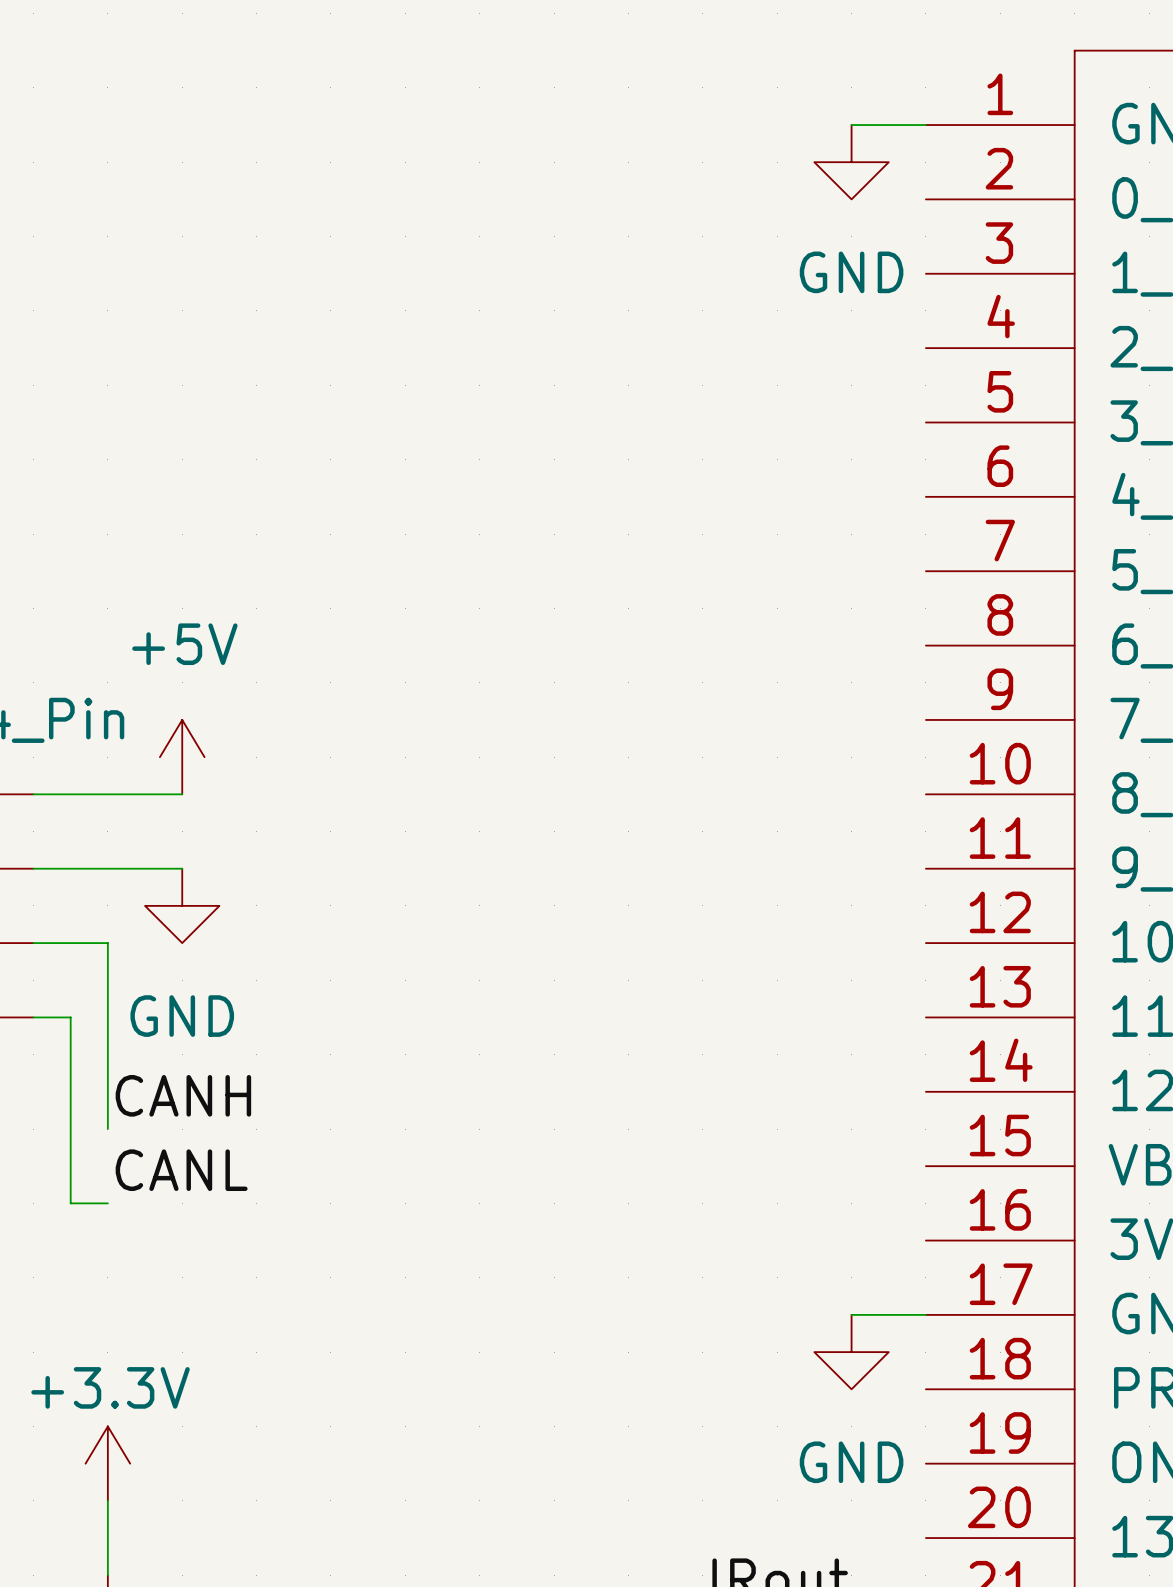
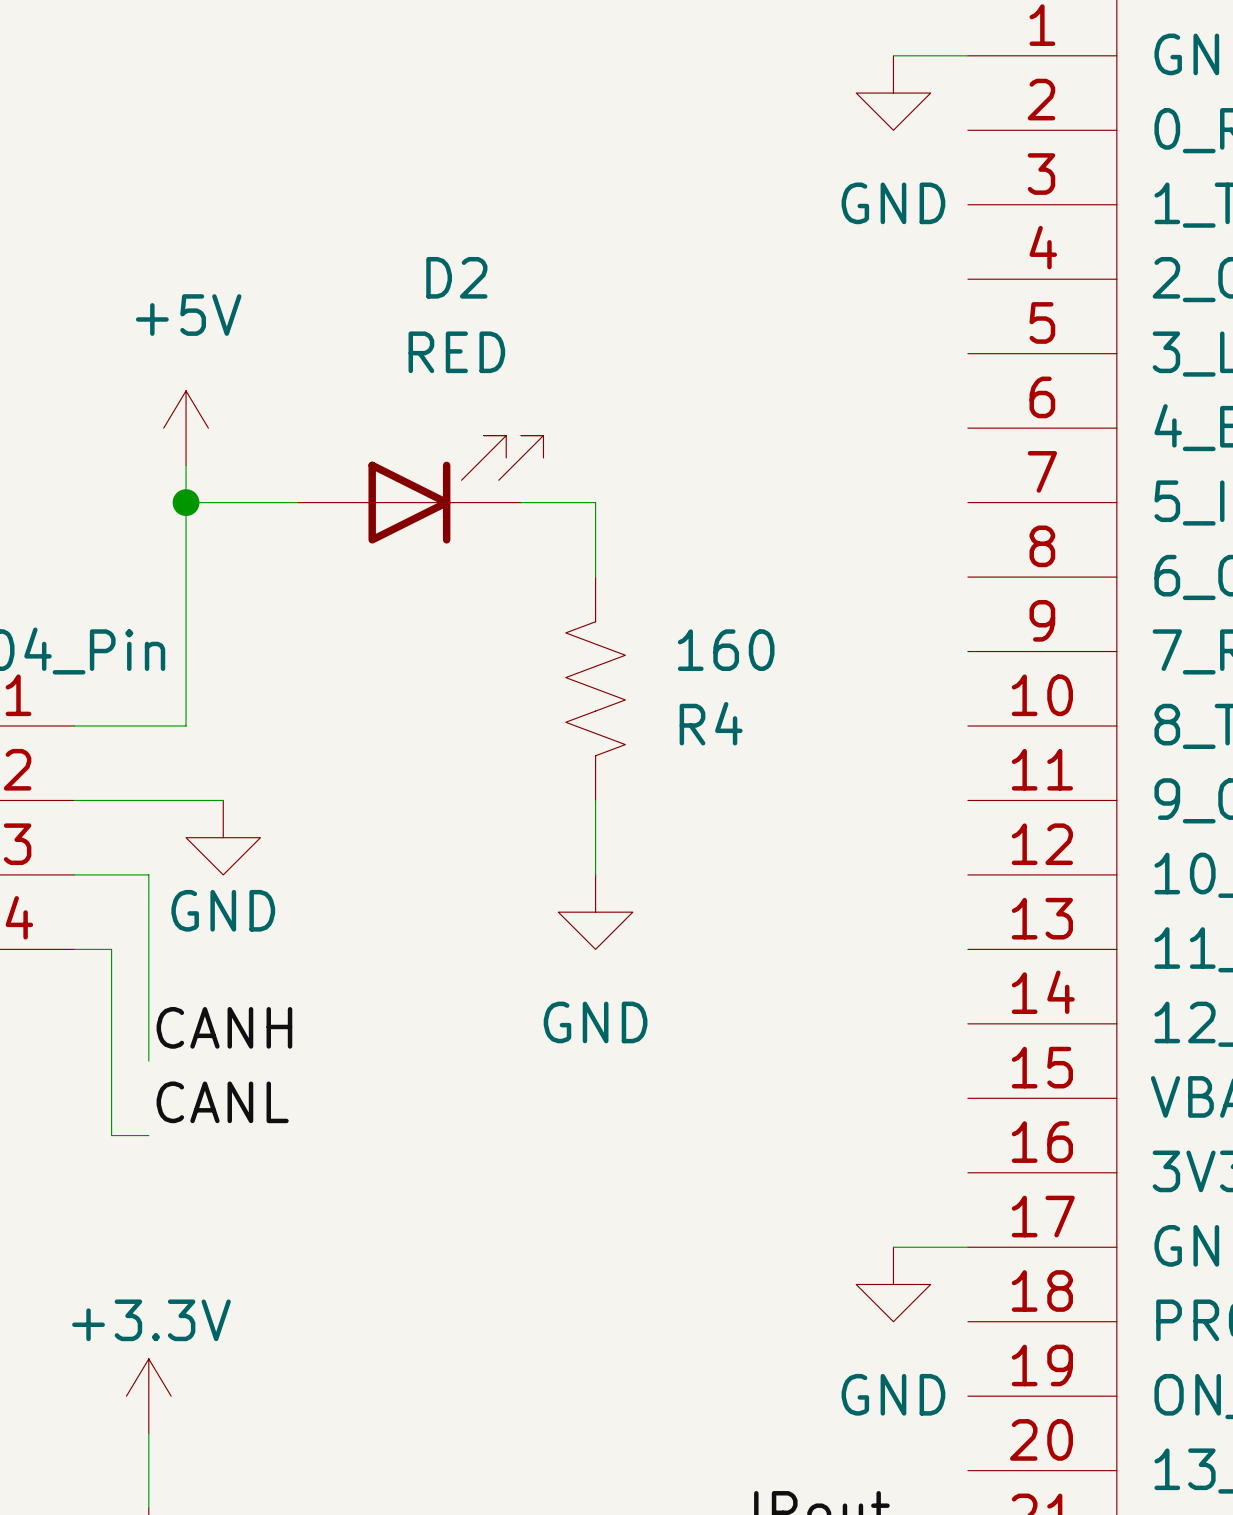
D2: none -> RED (420, 489)
wire: none -> (186, 502) (297, 502)
junction: none -> (186, 502)
wire: none -> (521, 502) (595, 502) (595, 577)
power symbol position: +5V (182, 757) -> +5V (186, 428)
R4: none -> 160 (595, 688)
wire: (145, 794) (182, 794) -> (186, 726) (186, 465)
wire: none -> (595, 800) (595, 874)
power symbol: none -> GND (595, 912)
power symbol text position: GND (182, 1016) -> GND (223, 910)

